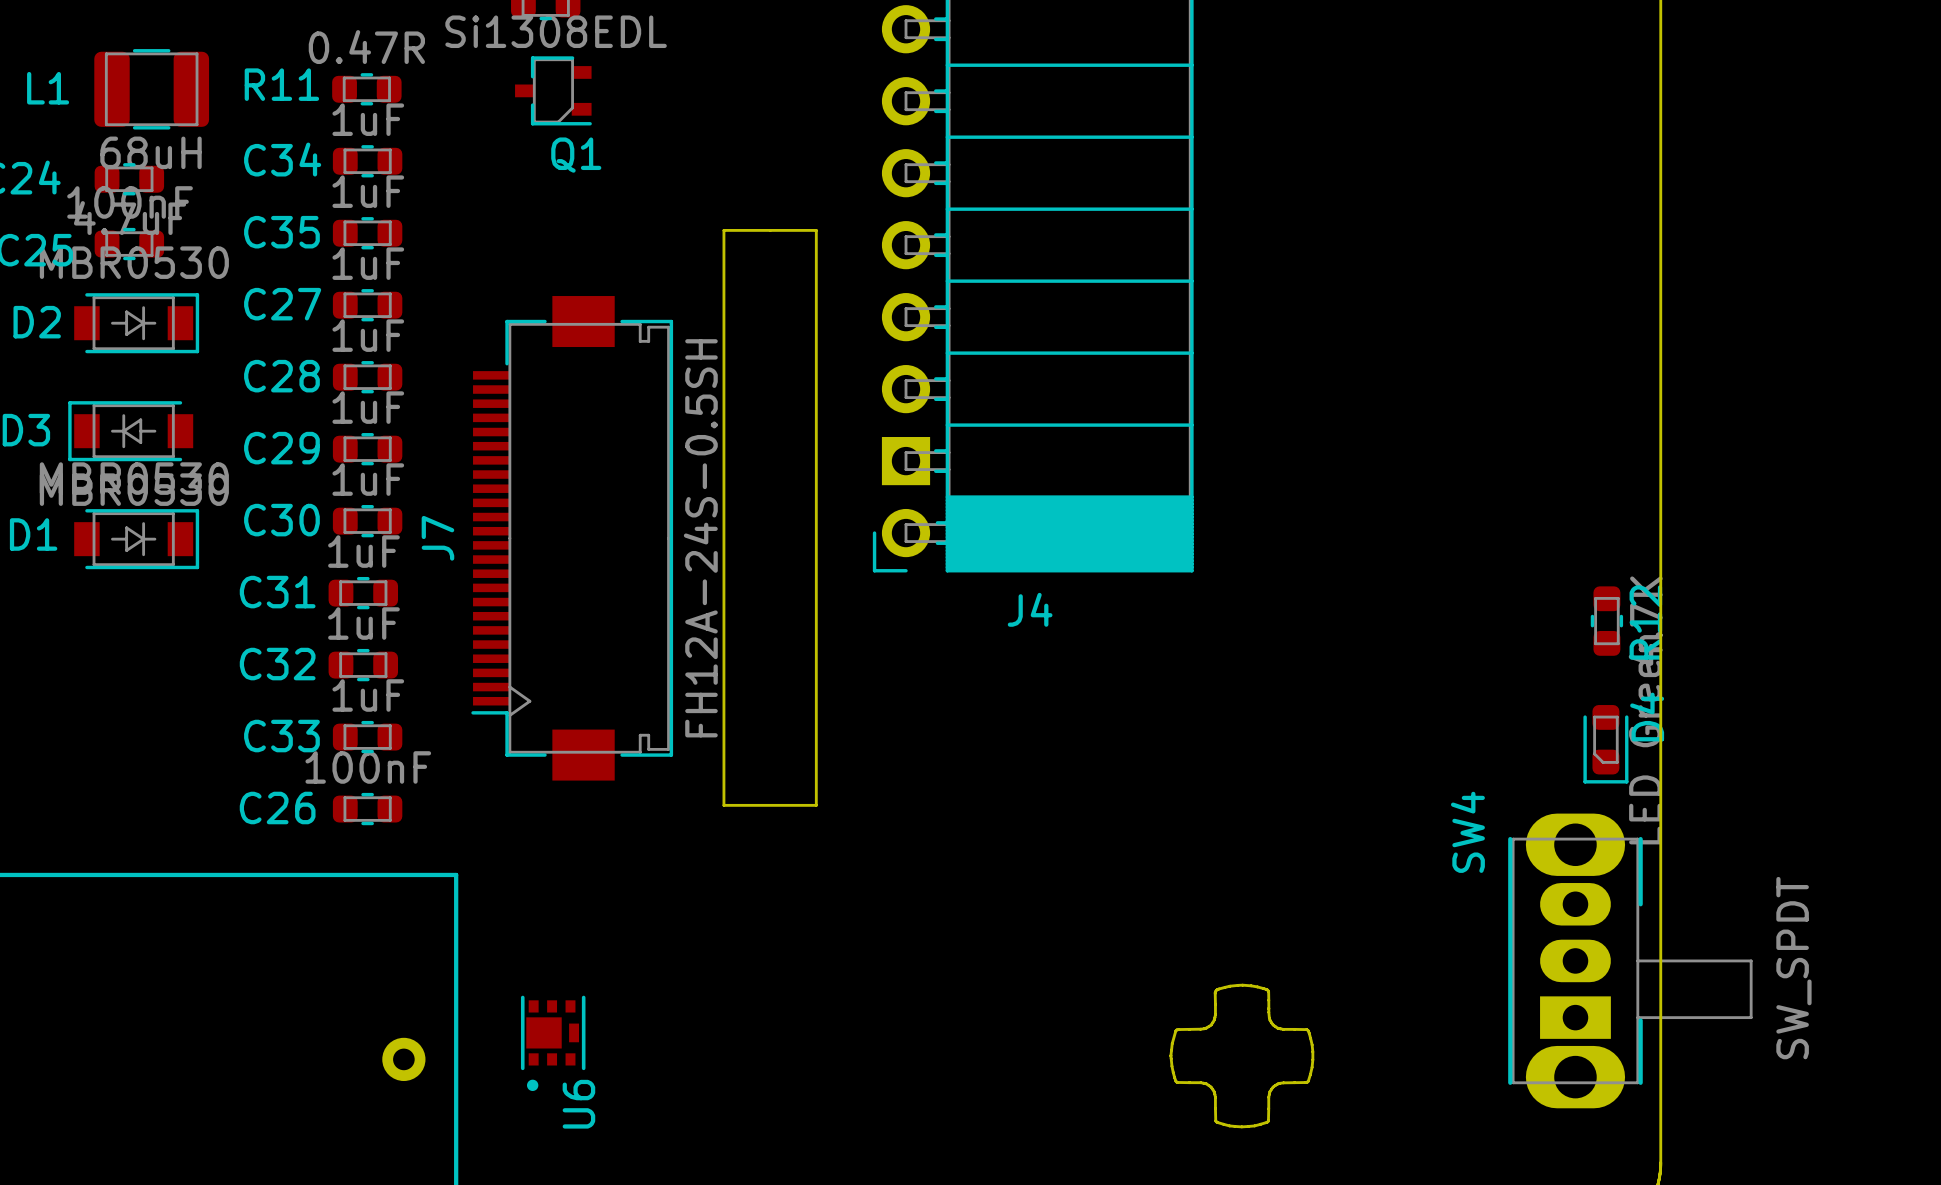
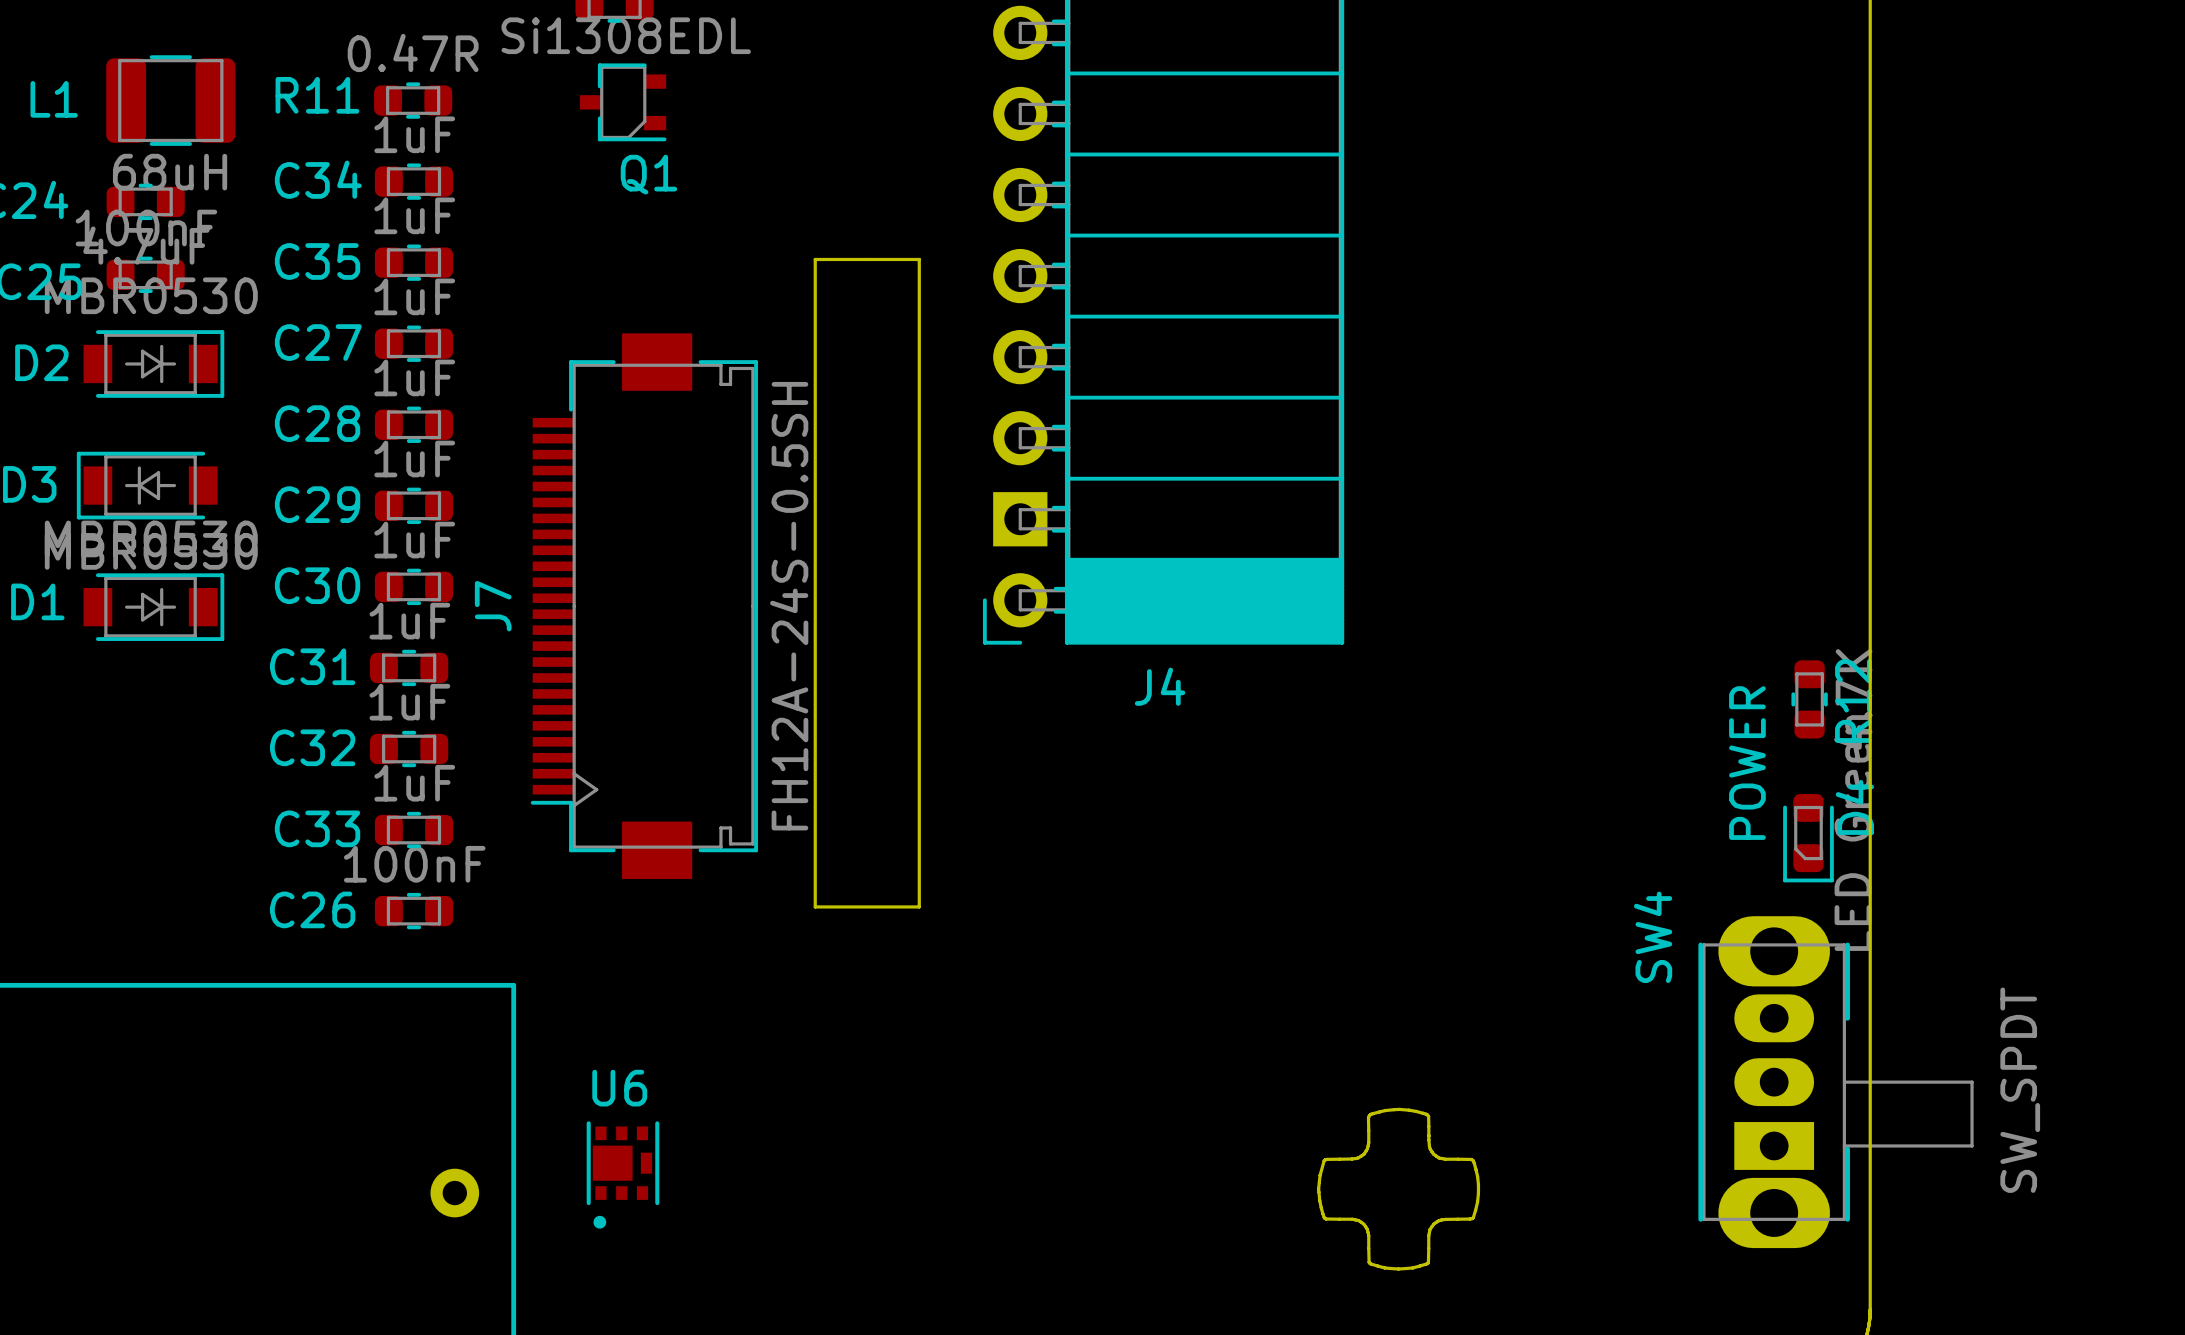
text: none -> POWER (1747, 763)
U6 name rotation: 0° (578, 1104) -> 90° clockwise (619, 1088)
U6 name position: U6 (578, 1104) -> U6 (619, 1088)

